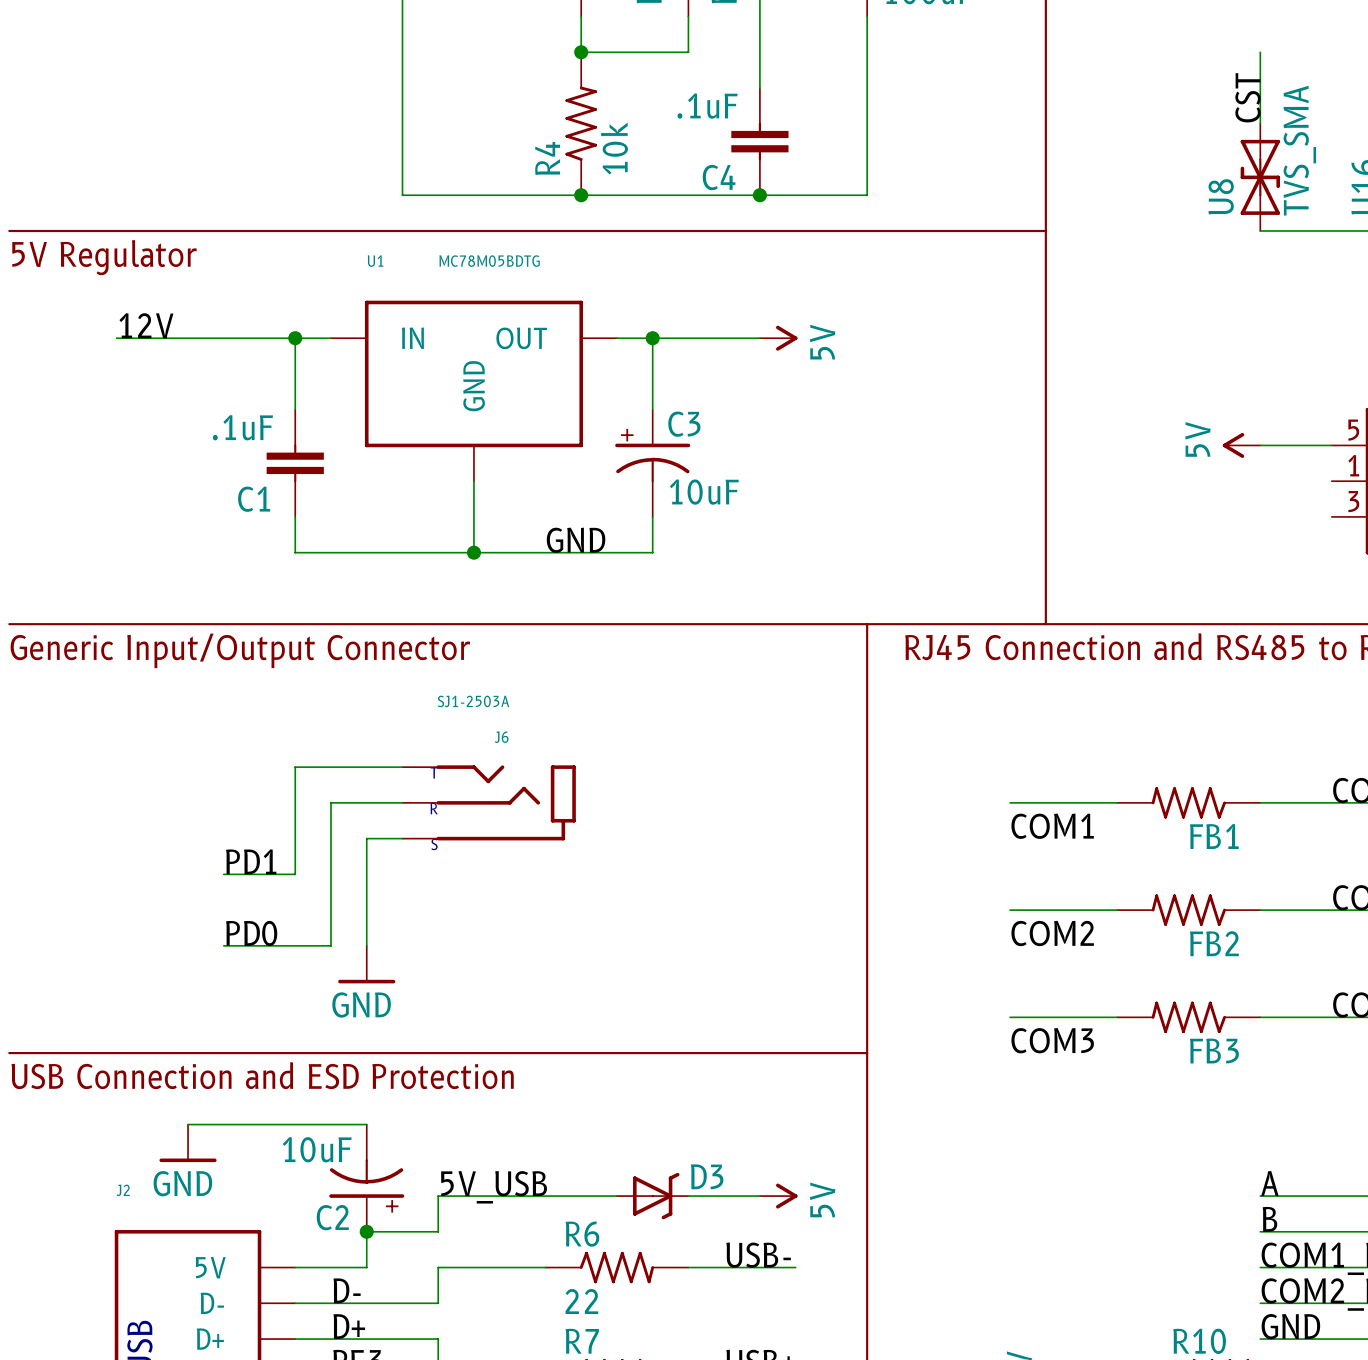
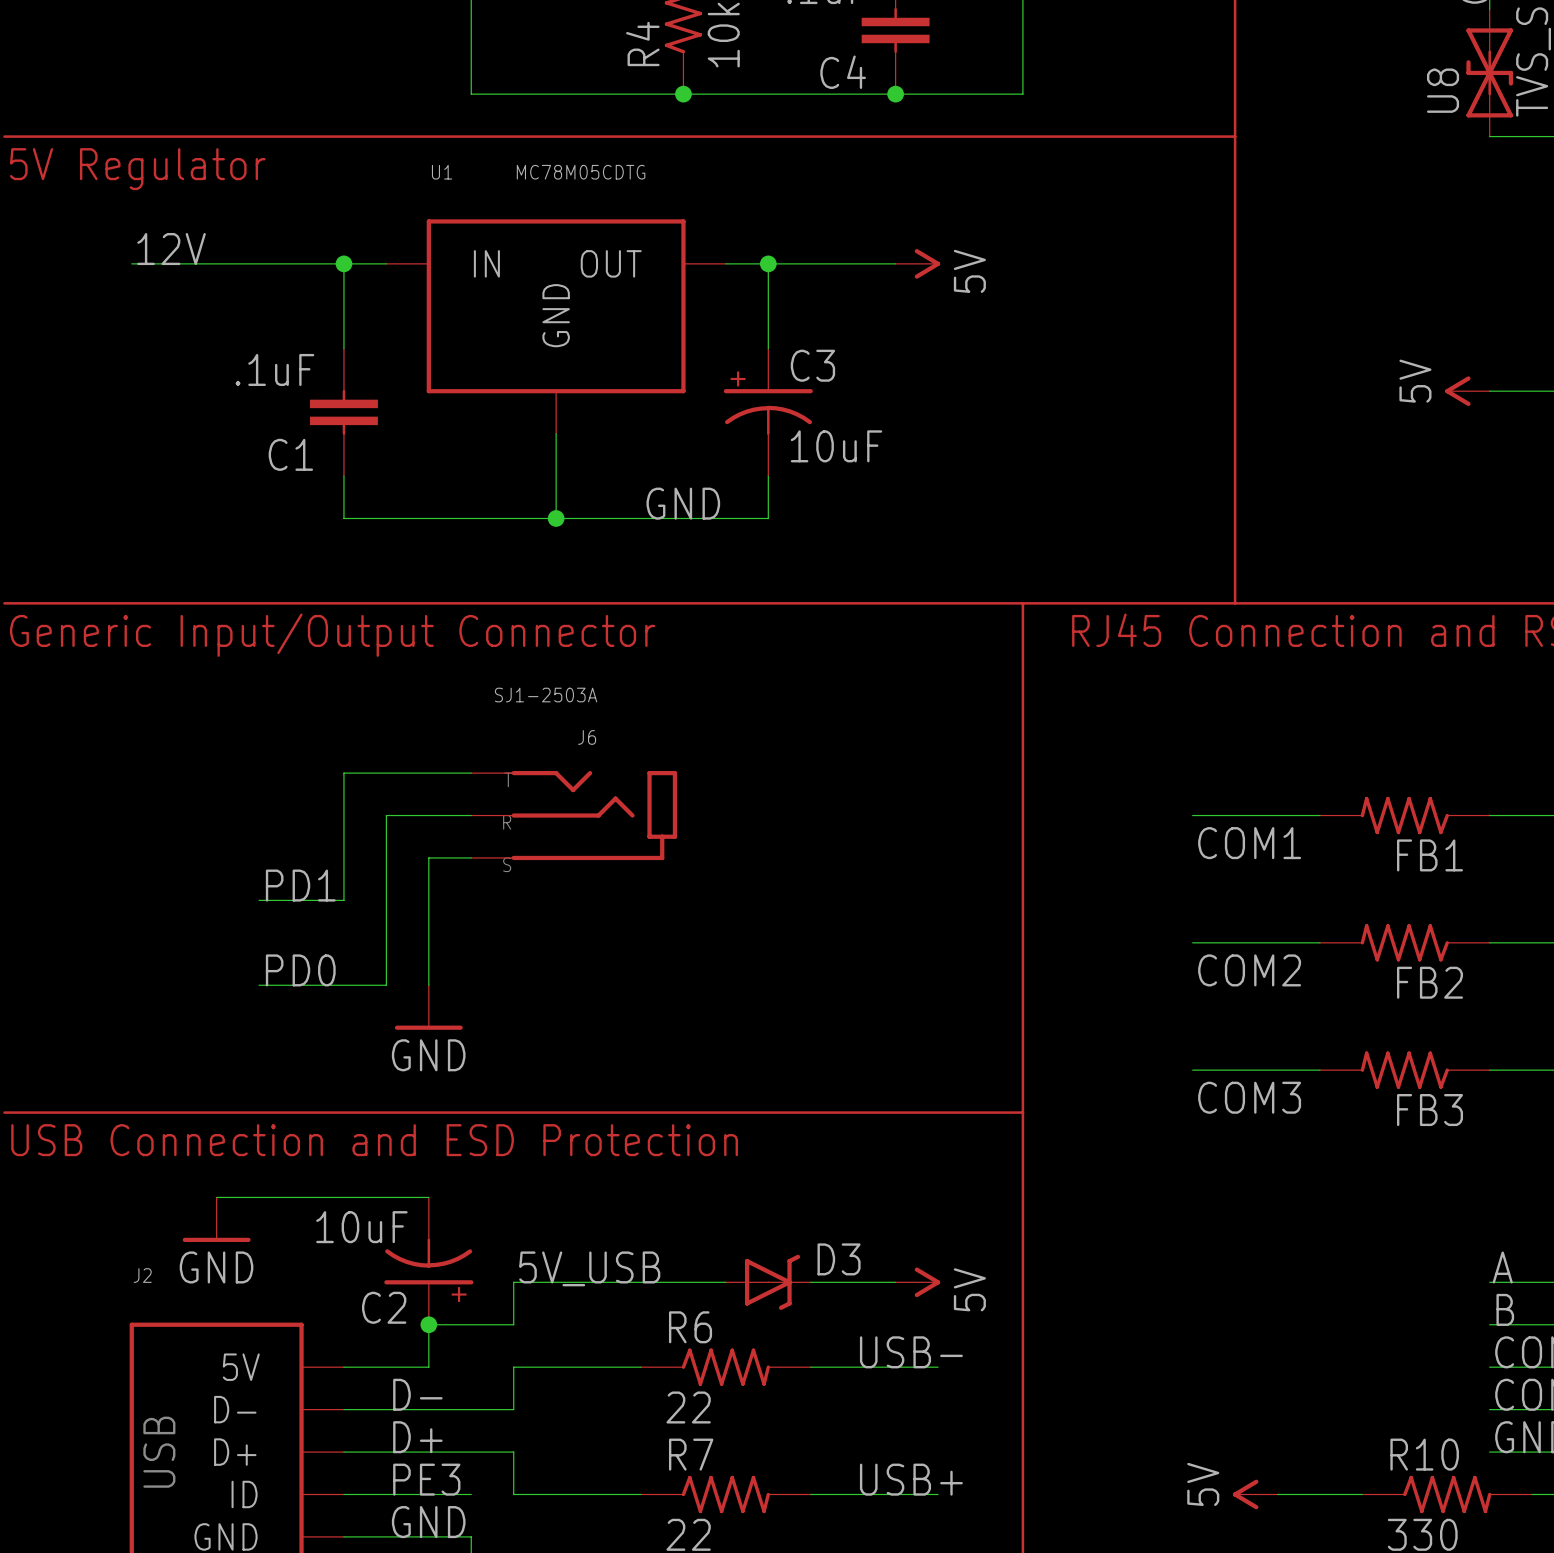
U1 value: MC78M05BDTG (489, 261) -> MC78M05CDTG (581, 172)

